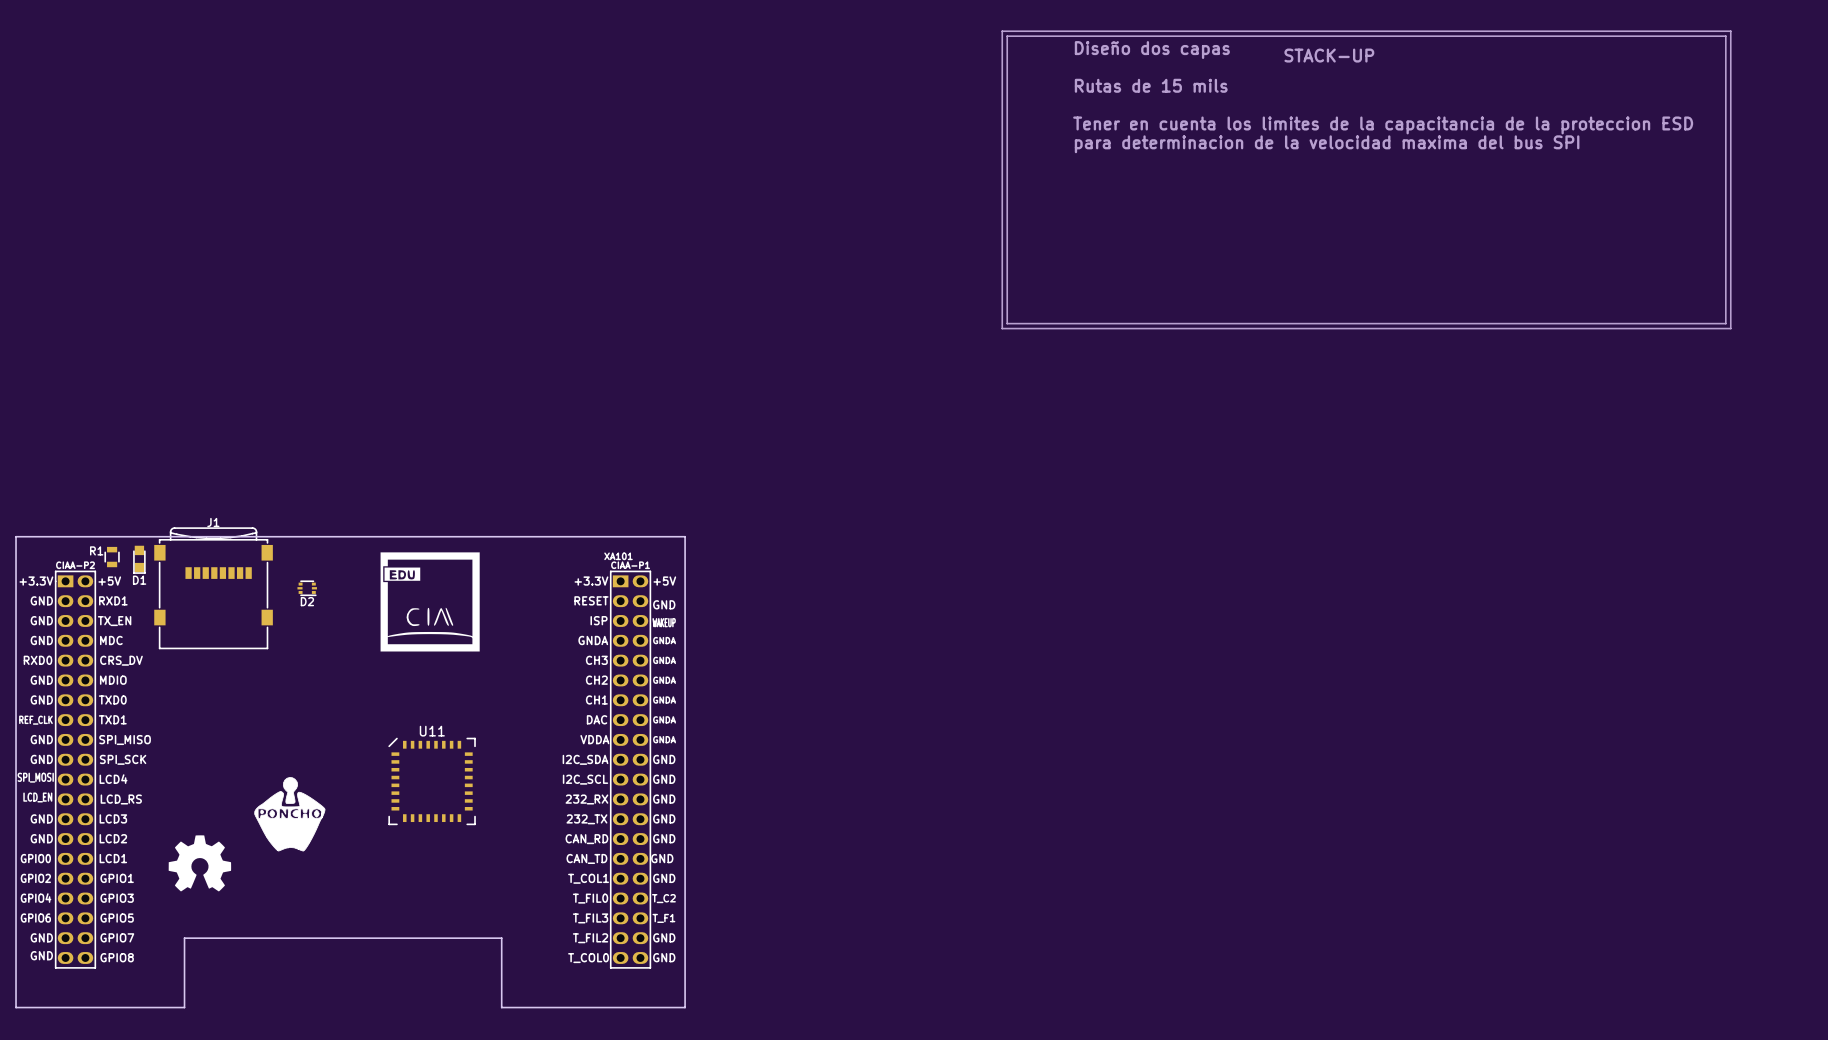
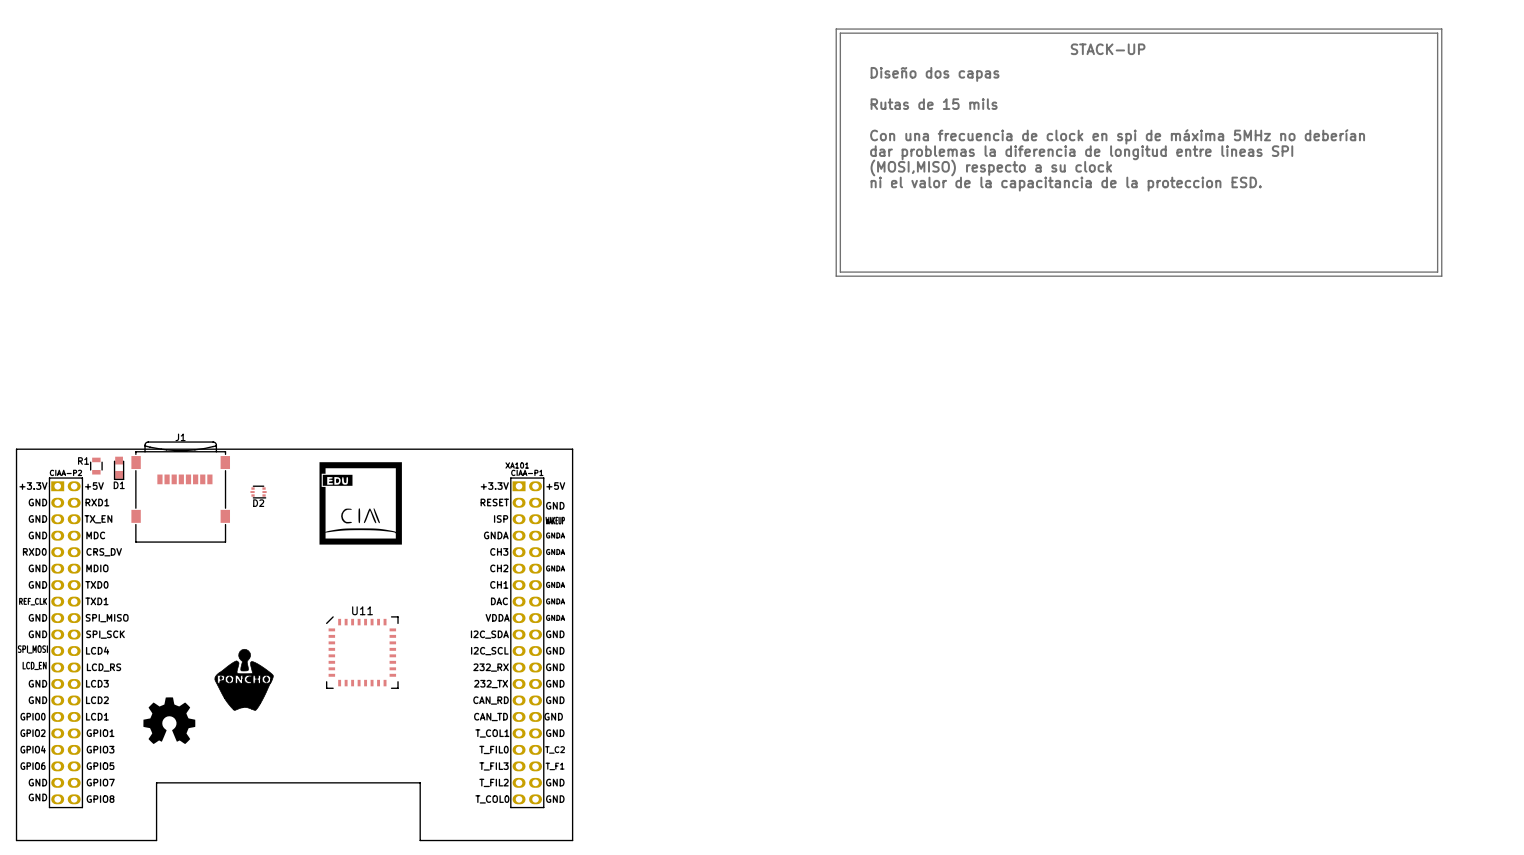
text position: Diseño dos capas (1152, 50) -> Diseño dos capas (935, 74)
text position: Rutas de 15 mils (1151, 85) -> Rutas de 15 mils (934, 104)
text: Tener en cuenta los limites de la capacitancia de la proteccion ESD (1383, 125) -> none
text: para determinacion de la velocidad maxima del bus SPI (1327, 144) -> none
text: none -> Con una frecuencia de clock en spi de máxima 5MHz no deberían (1117, 136)
text: none -> dar problemas la diferencia de longitud entre lineas SPI (1081, 152)
text: none -> (MOSI,MISO) respecto a su clock (991, 167)
text: none -> ni el valor de la capacitancia de la proteccion ESD. (1066, 184)

